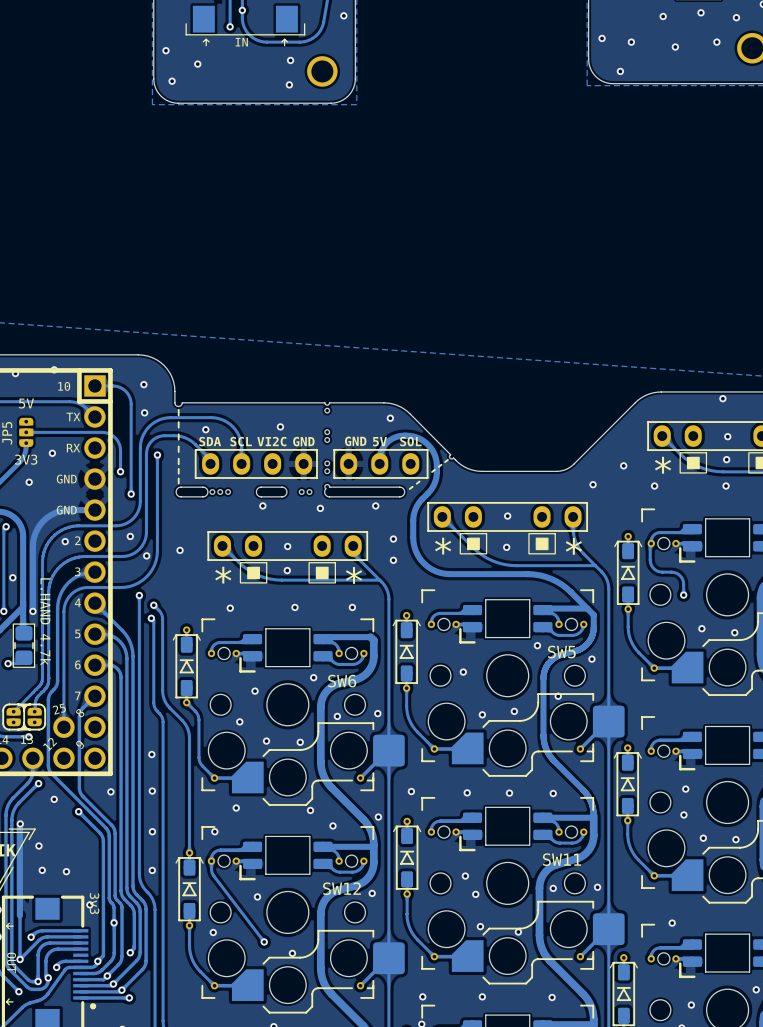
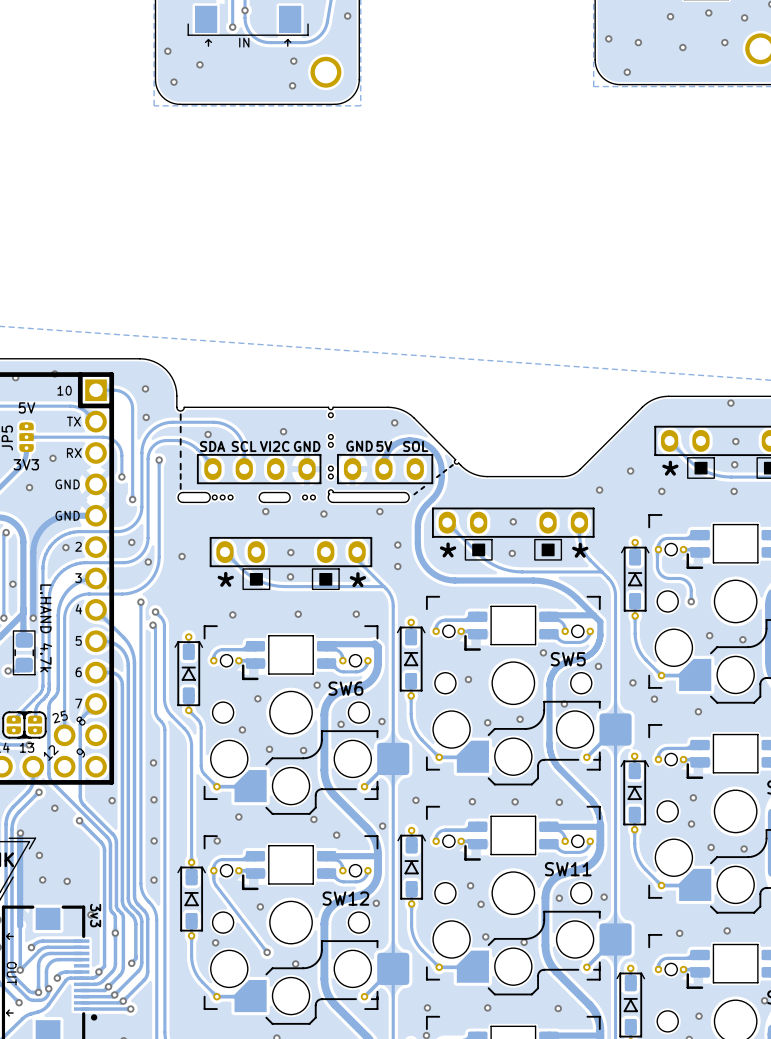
via: none -> (632, 682)
via: none -> (654, 699)
via: none -> (698, 711)
via: none -> (727, 930)

